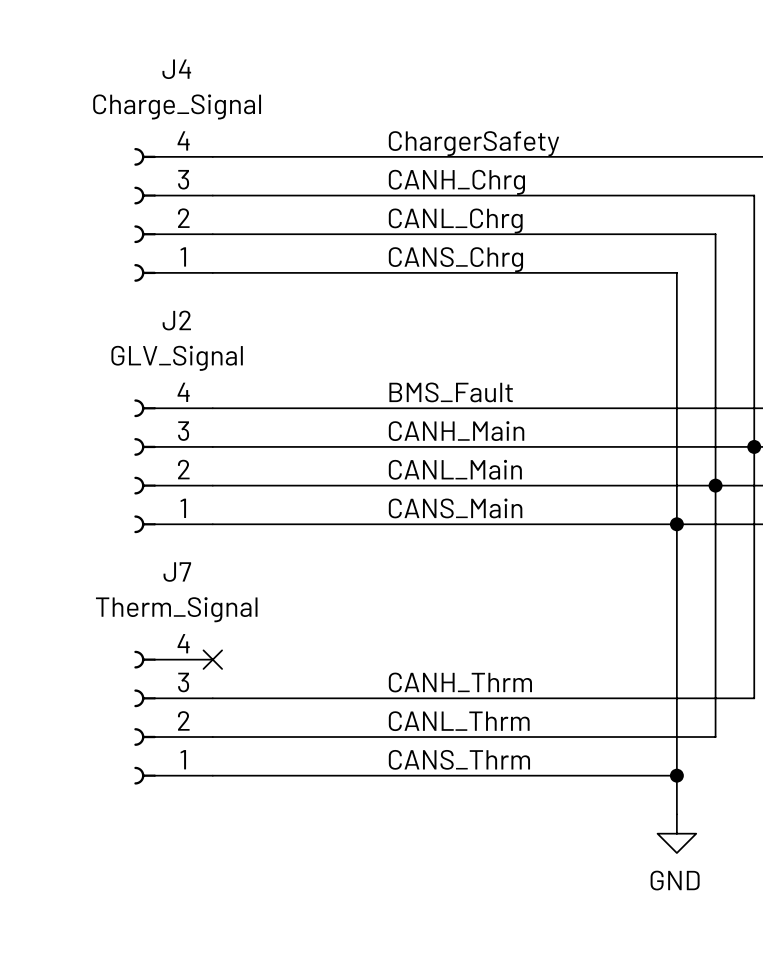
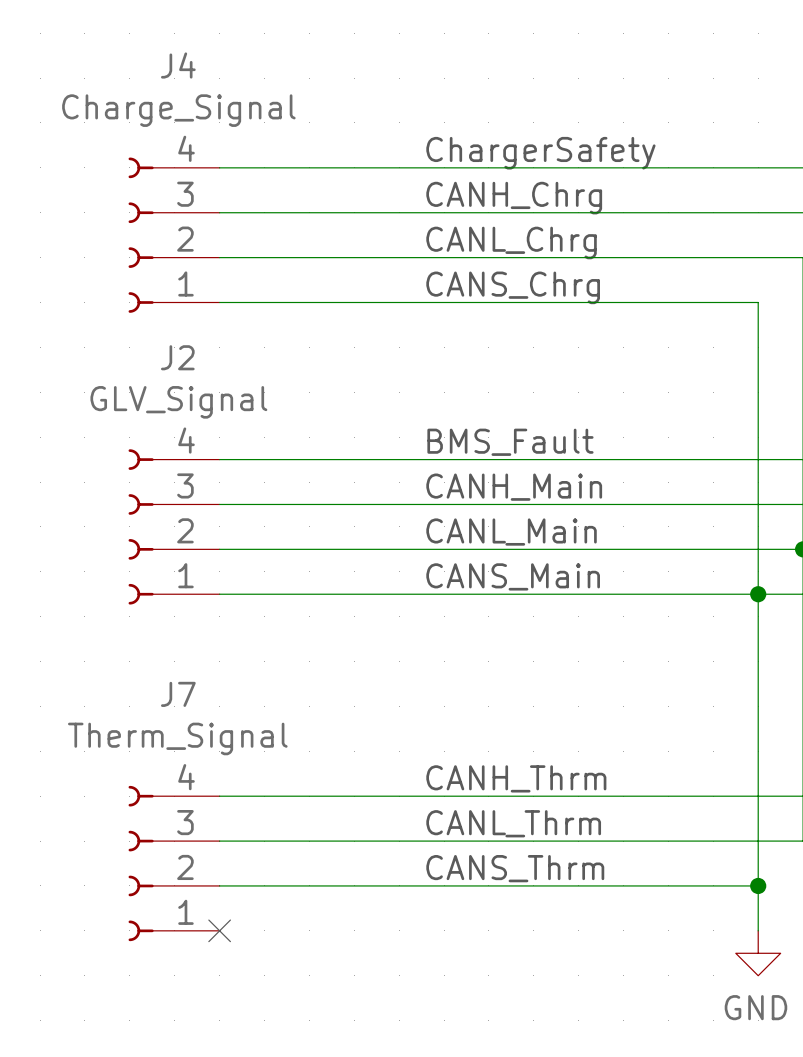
no-connect mark: (212, 659) -> none
J7 position: (173, 717) -> (174, 863)
no-connect mark: none -> (219, 930)

